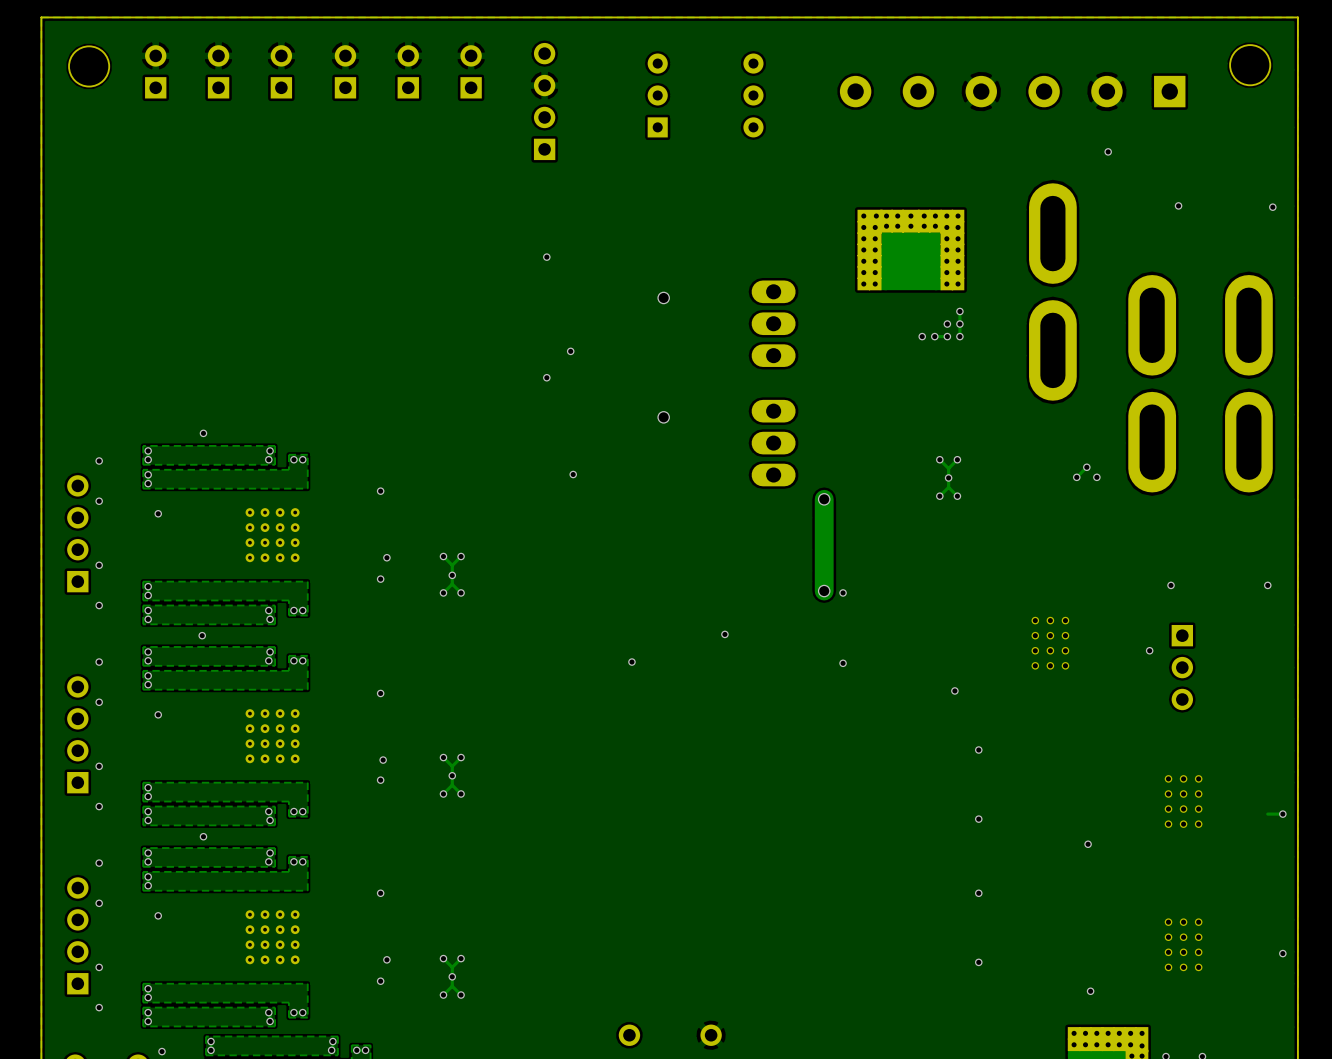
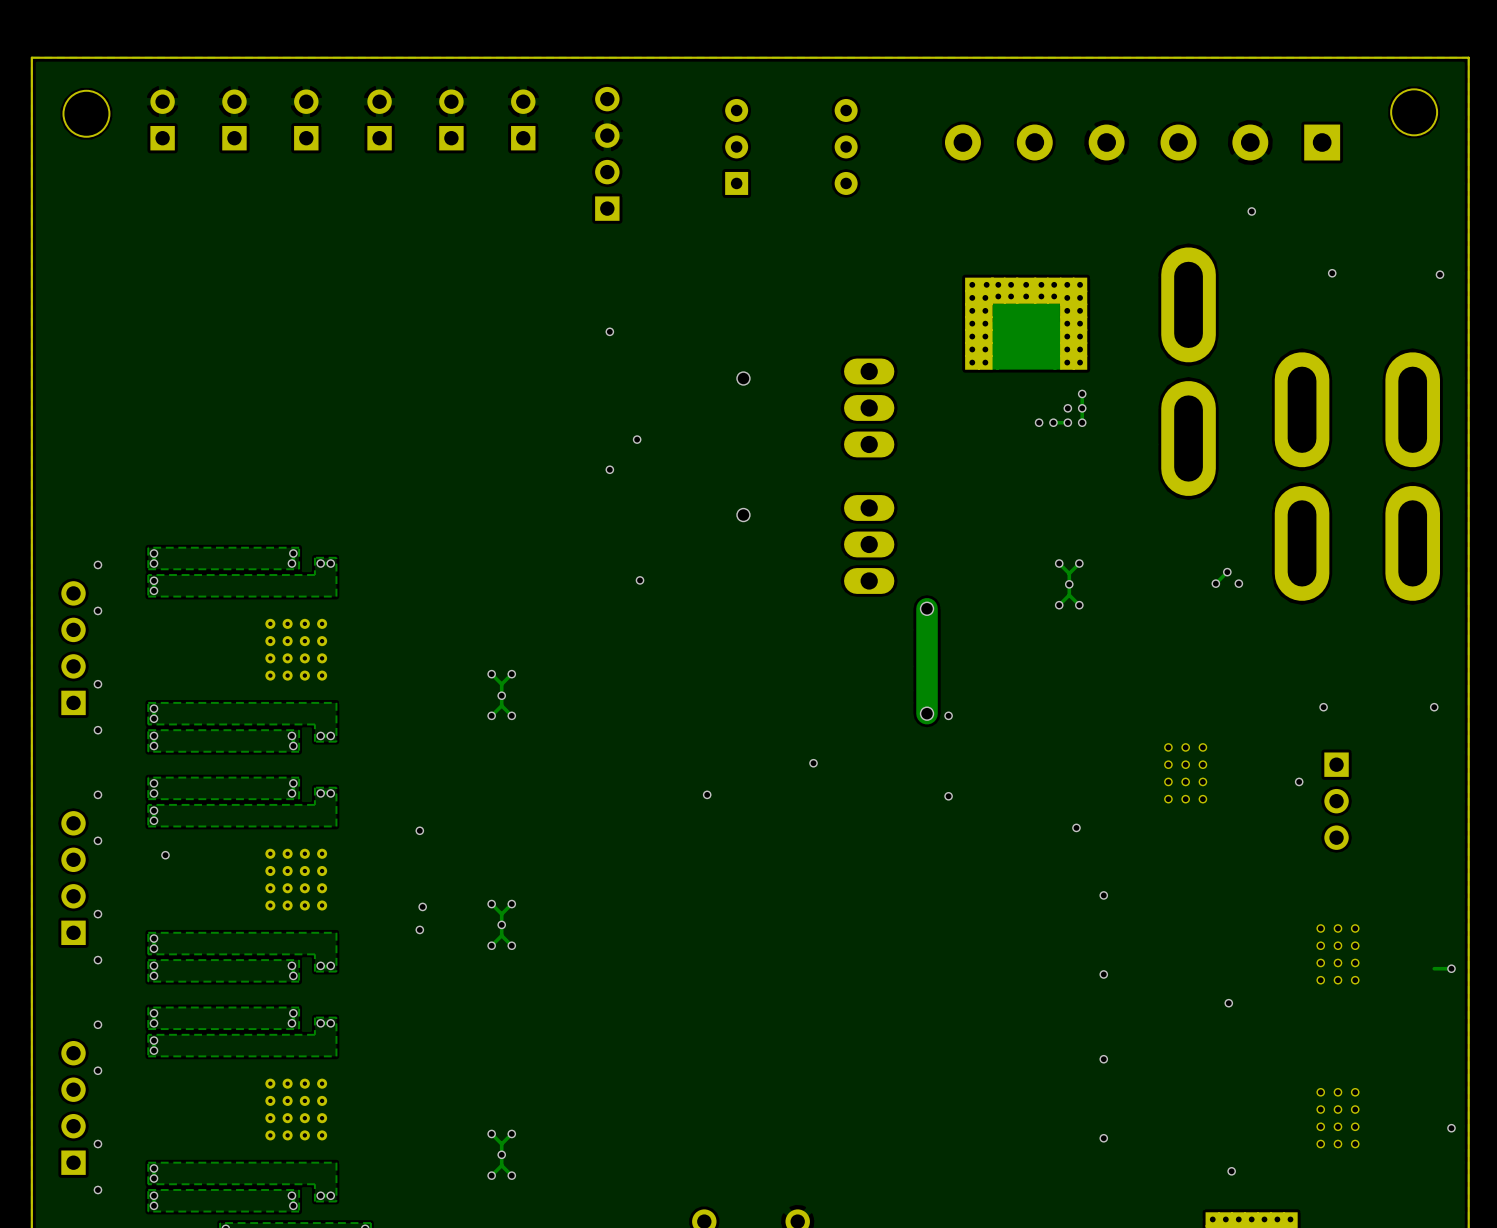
via: (203, 433) -> none
via: (380, 491) -> none
via: (158, 513) -> none
via: (386, 557) -> none
via: (380, 579) -> none
via: (202, 635) -> none
via: (203, 836) -> none
via: (380, 893) -> none
via: (158, 915) -> none
via: (386, 959) -> none
via: (380, 981) -> none

